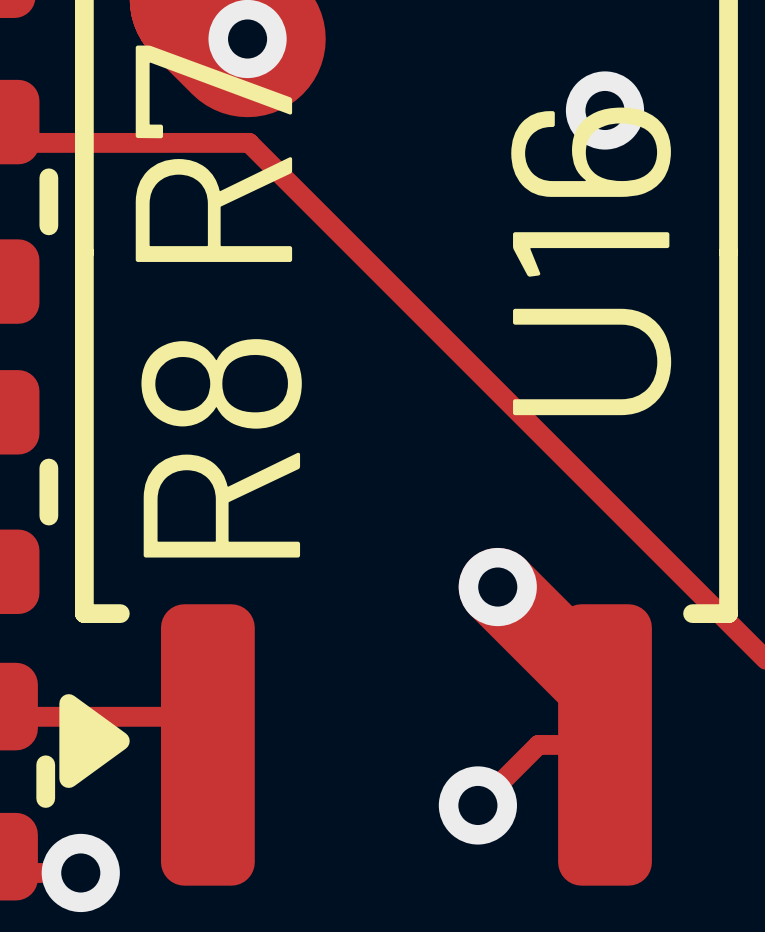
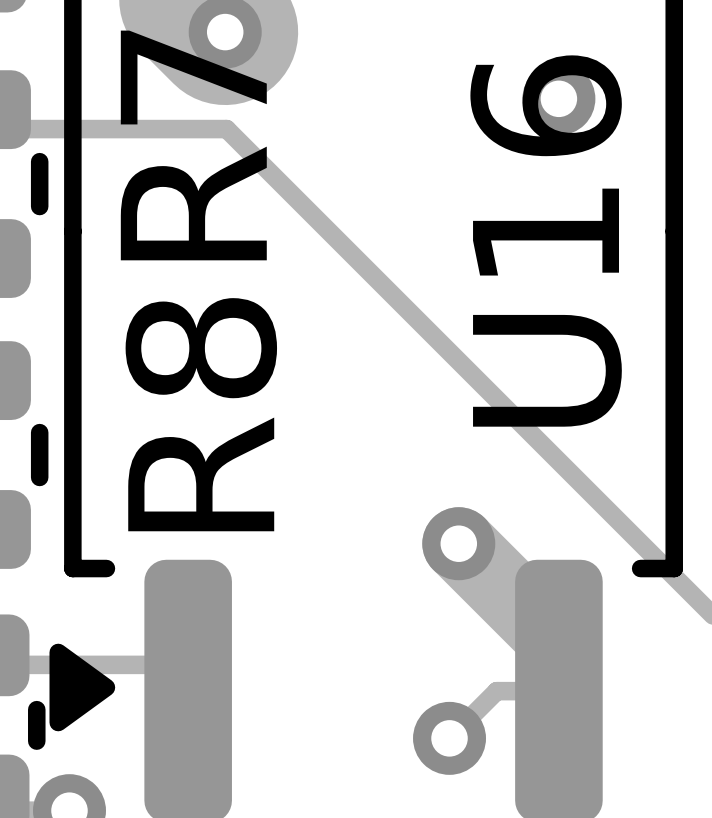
via position: (477, 805) -> (449, 738)

